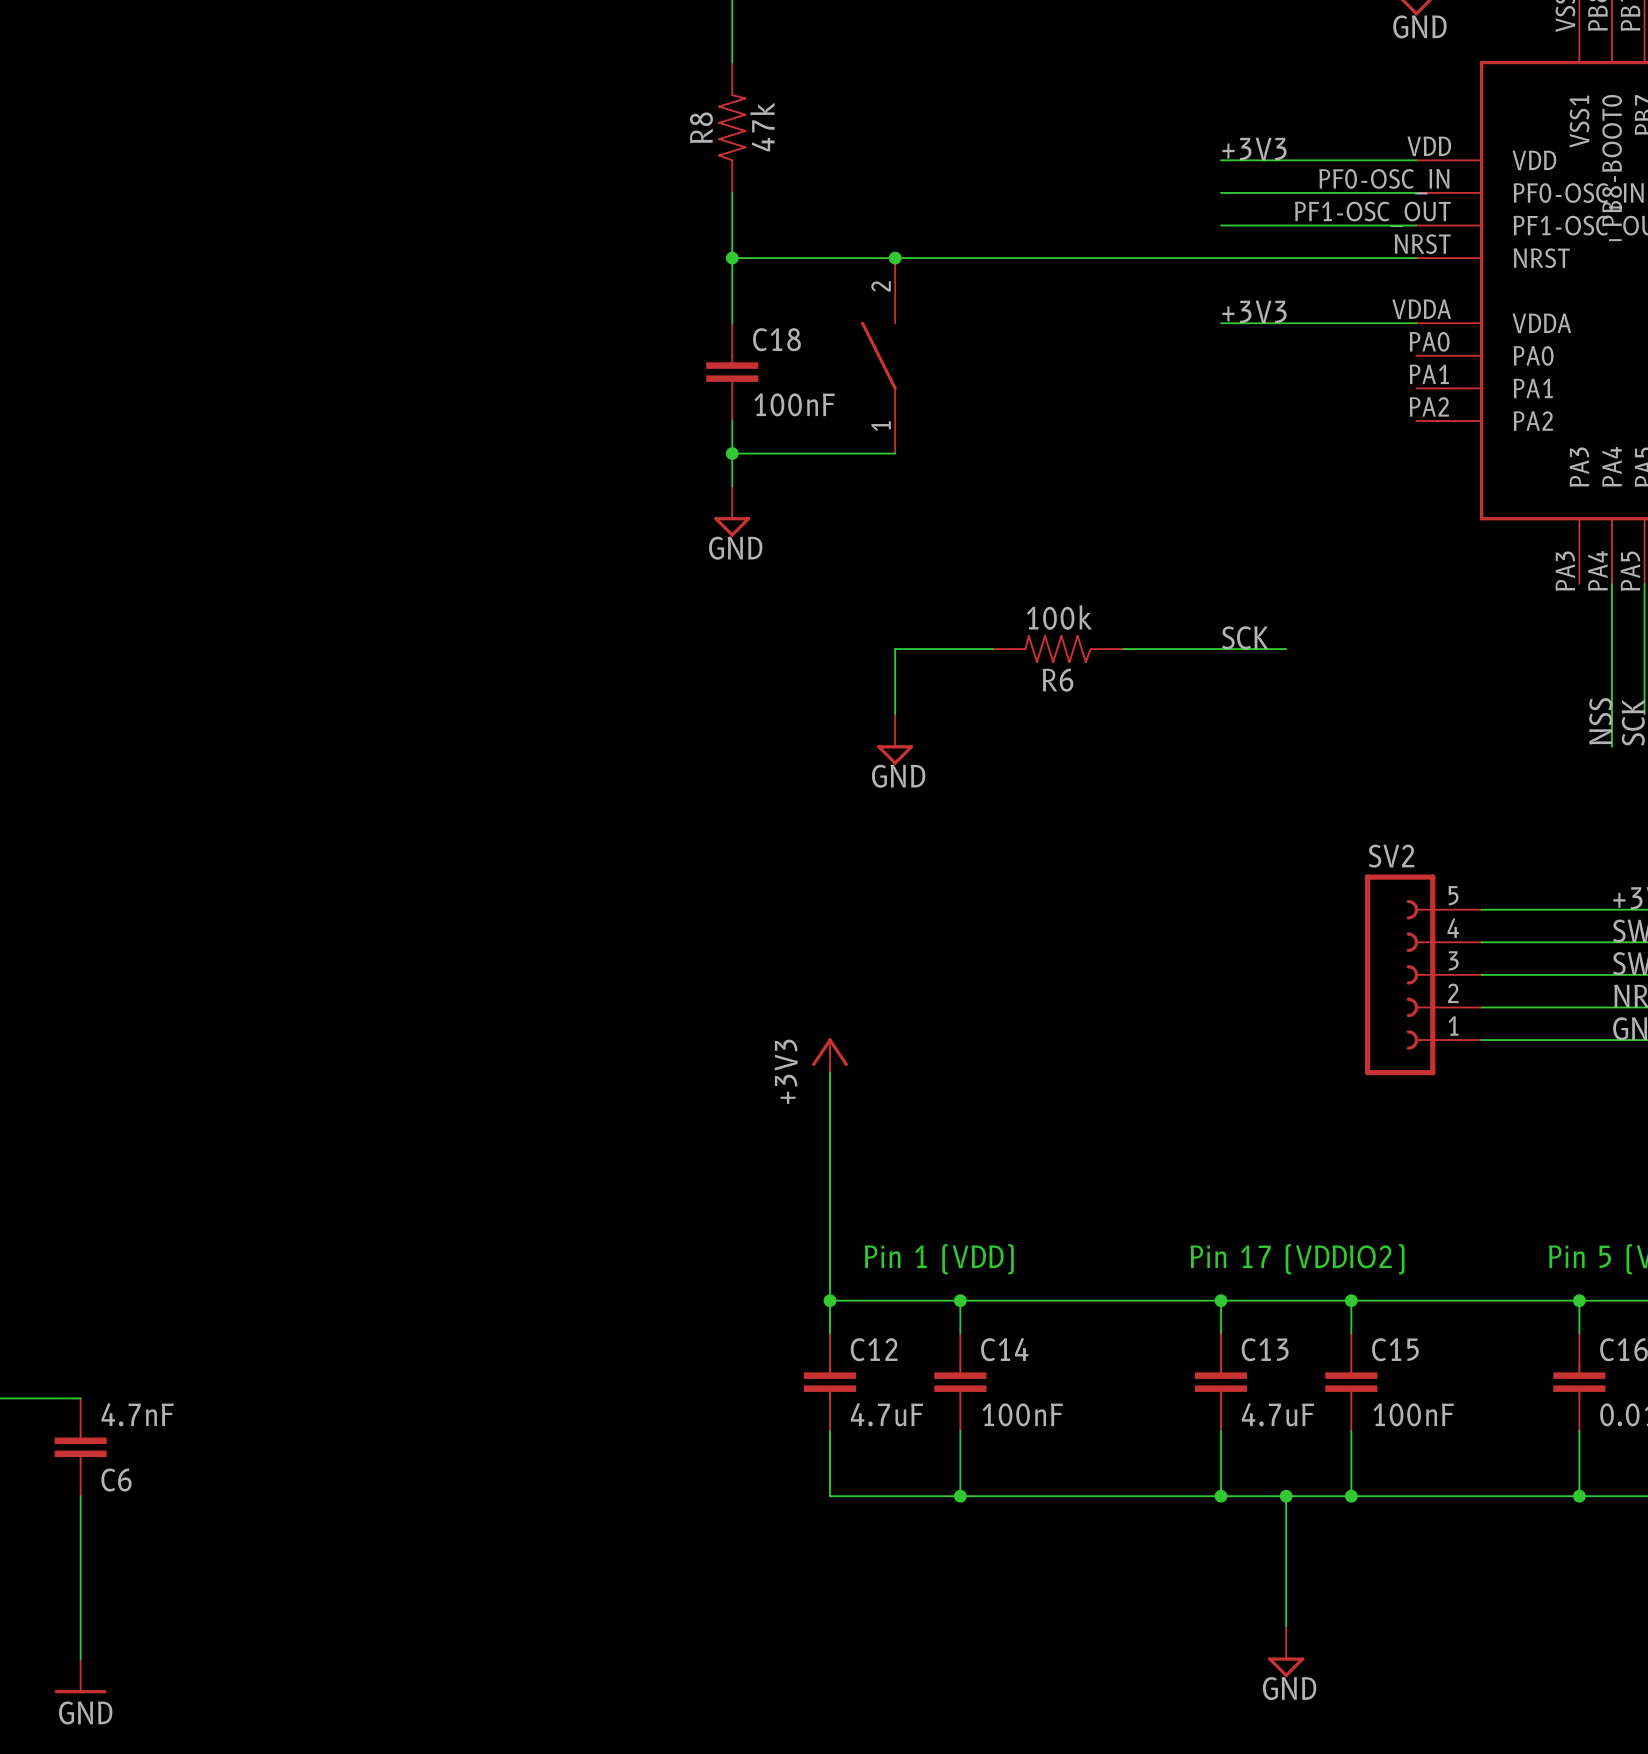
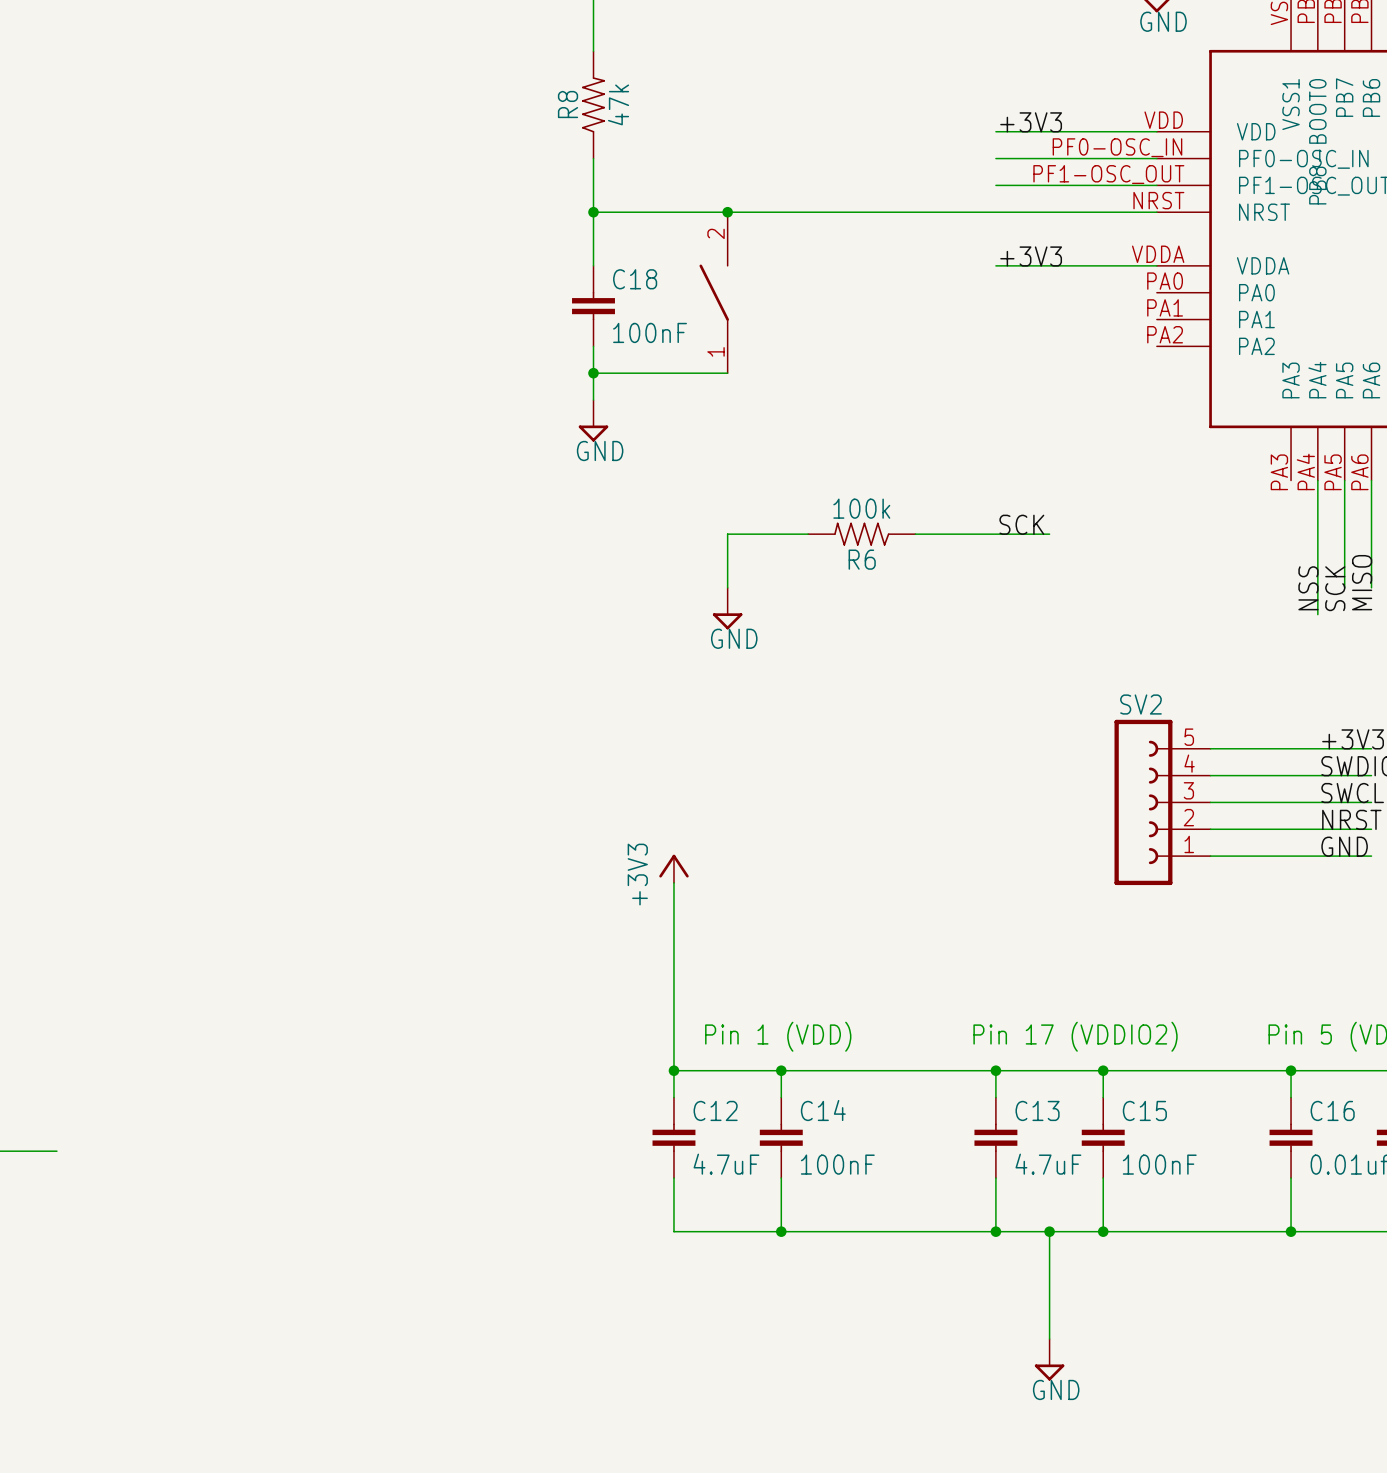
C6: 4.7nF (80, 1447) -> none
wire: (80, 1496) (80, 1659) -> none
power symbol: GND (80, 1676) -> none

